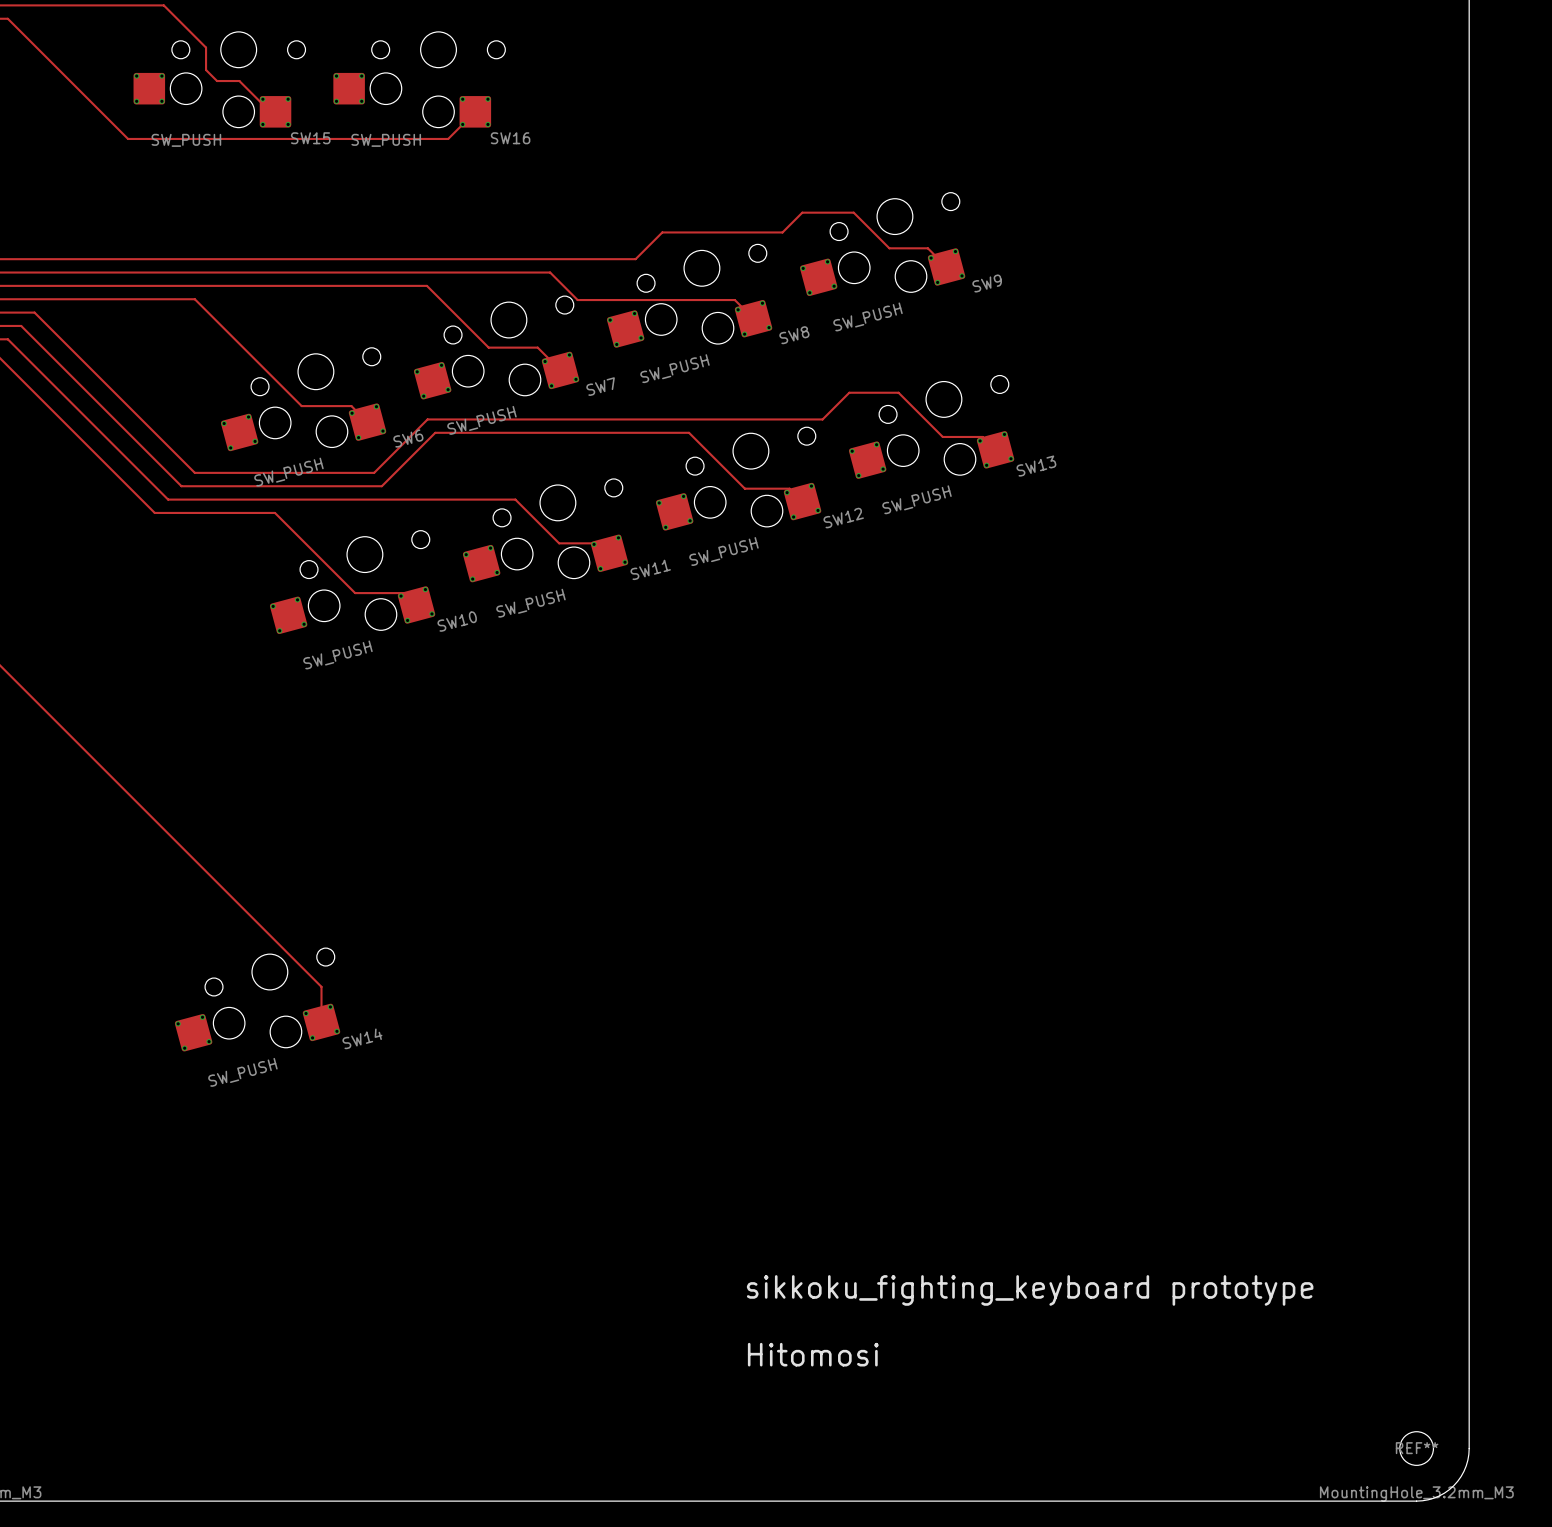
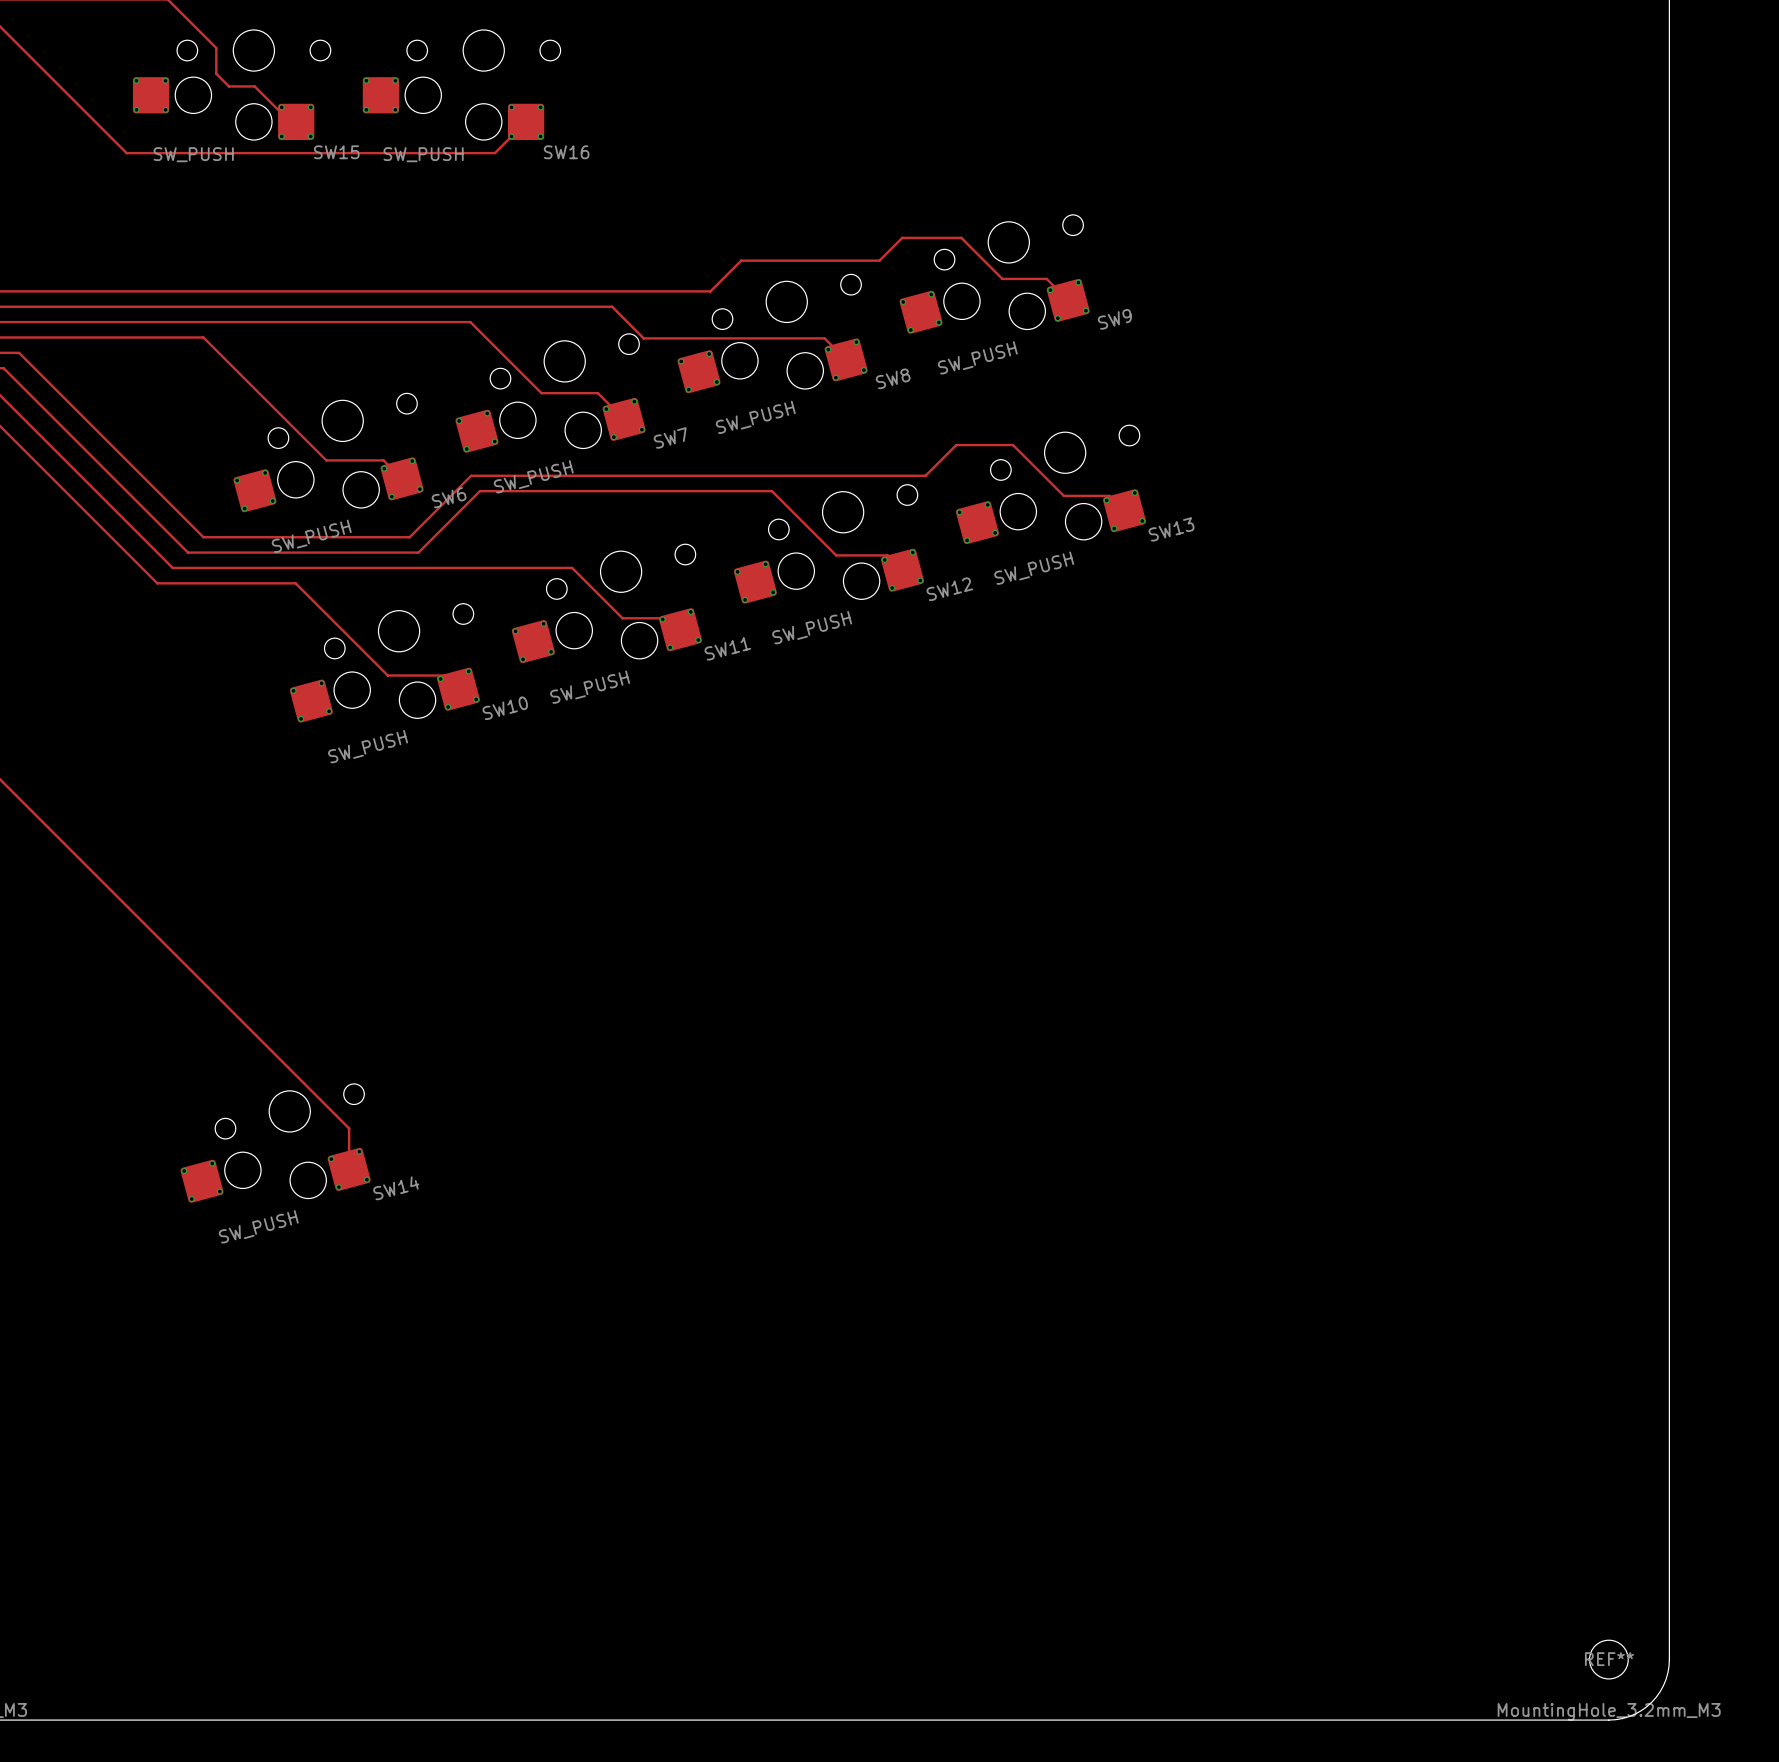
text: sikkoku_fighting_keyboard prototype (1030, 1290) -> none
text: Hitomosi (813, 1354) -> none

